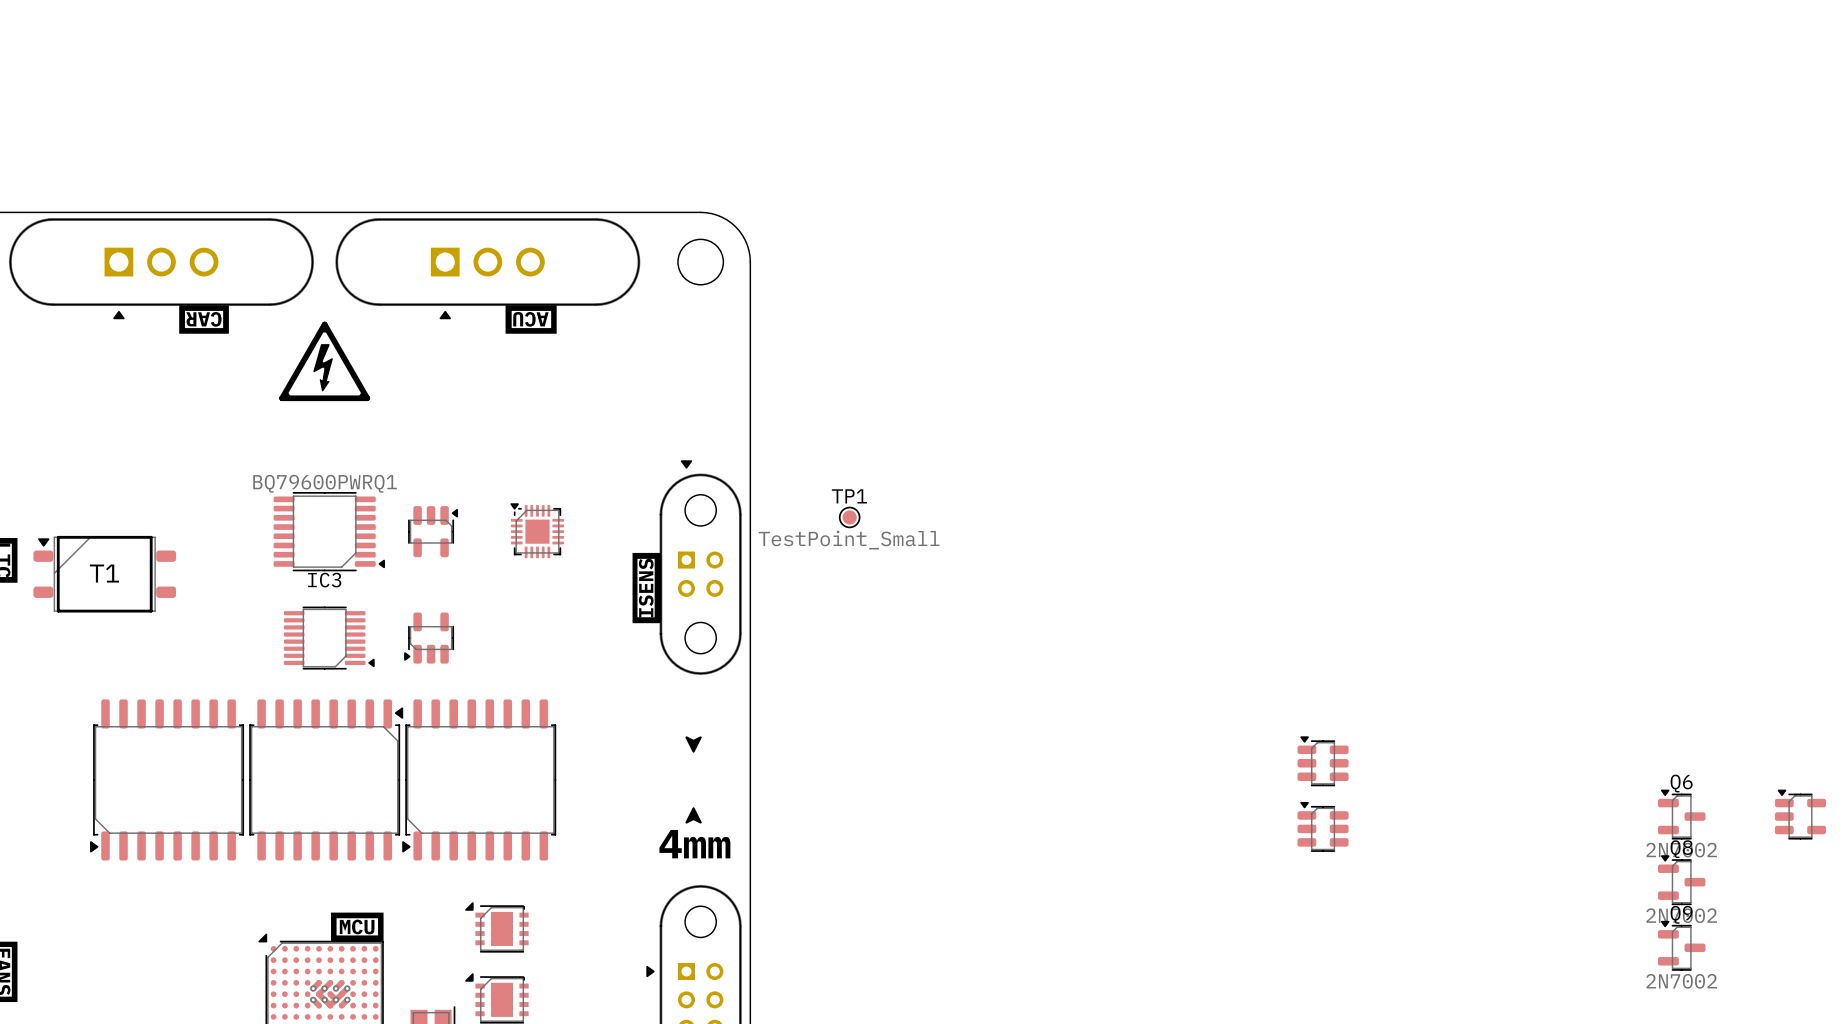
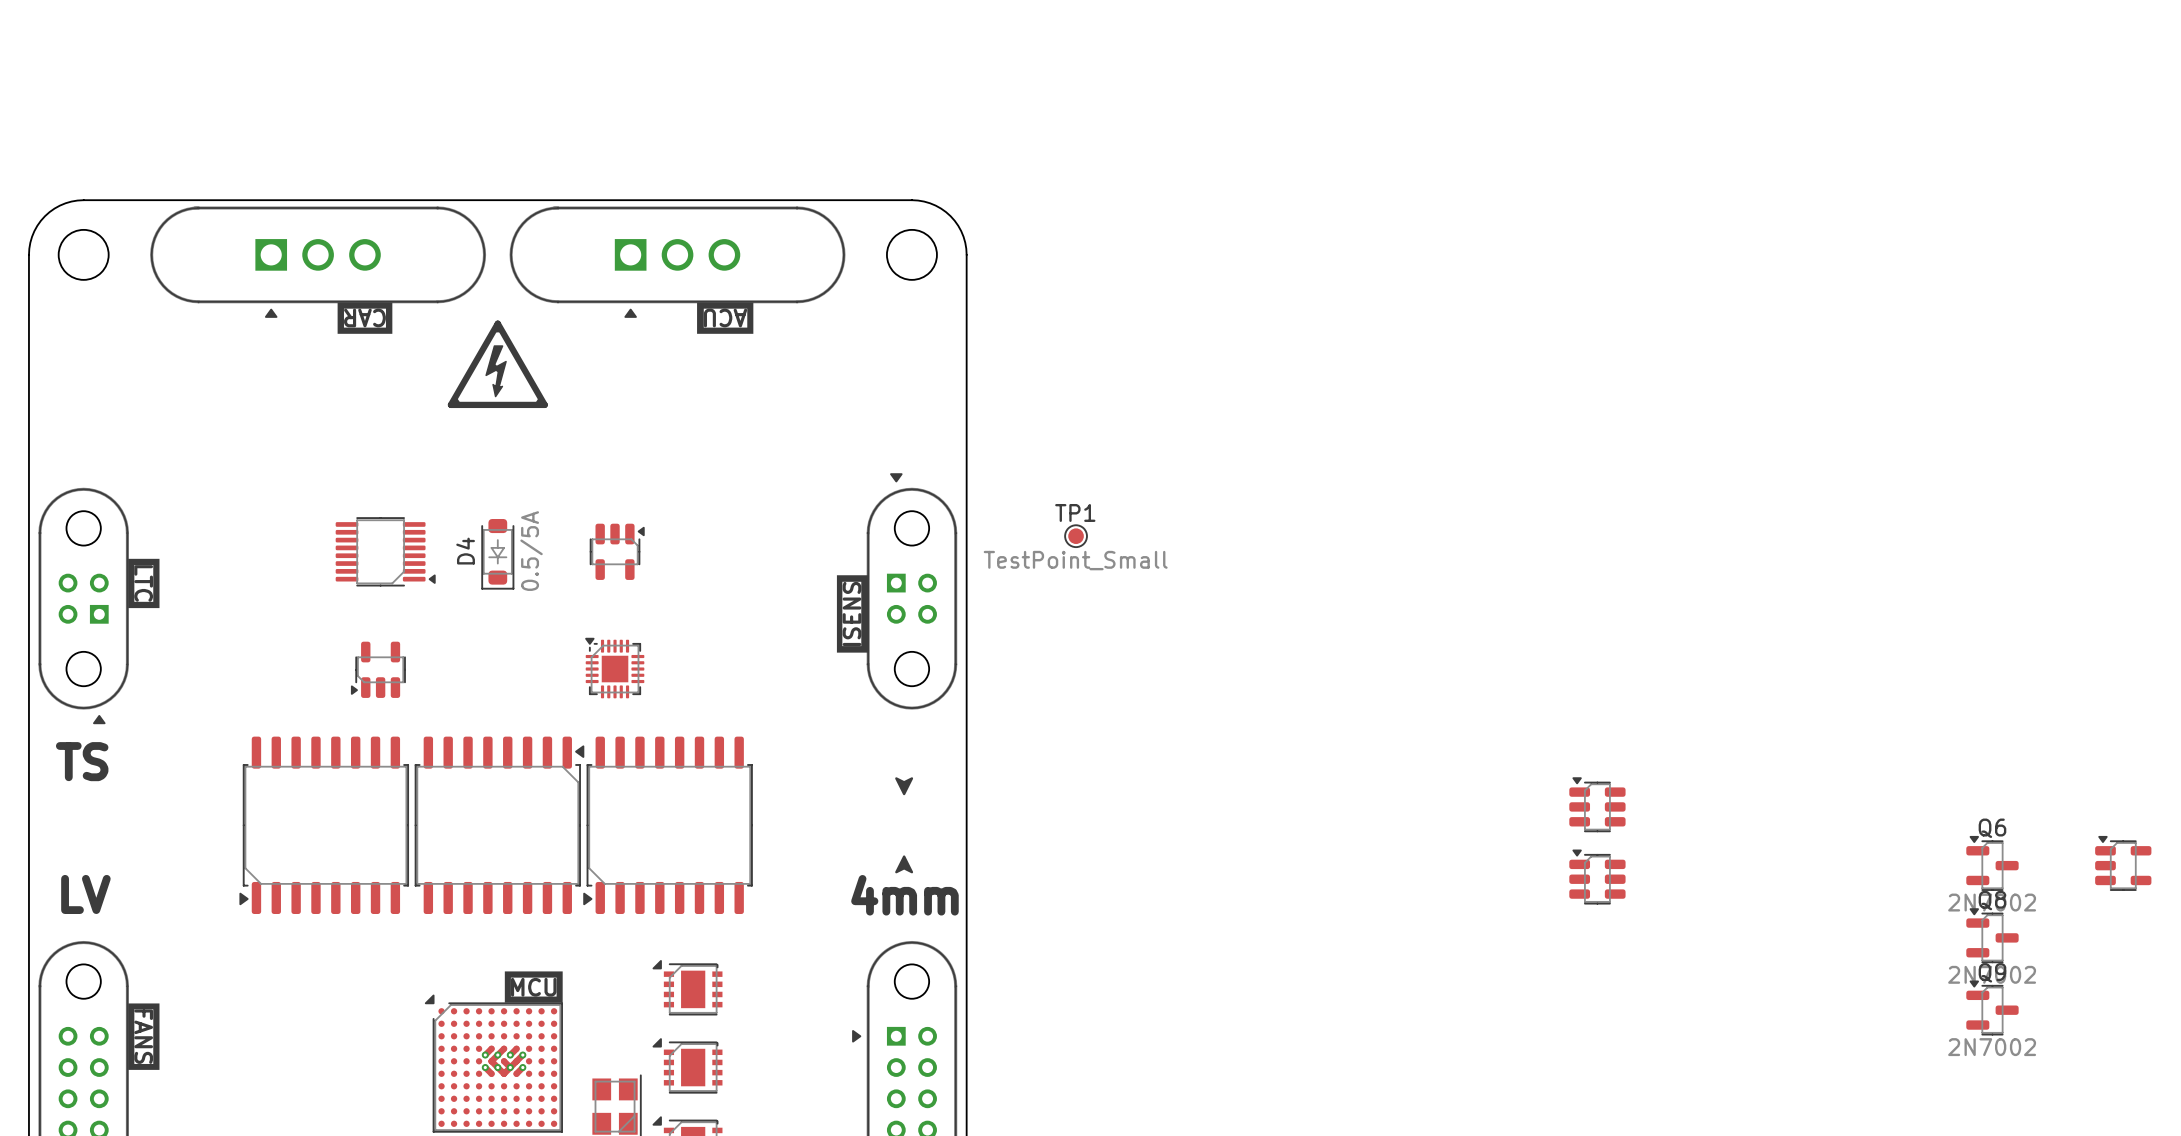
part: (537, 530) -> none
IC3: BQ79600PWRQ1 (329, 531) -> none
D4: none -> 0.5/5A (497, 554)
T1: (104, 574) -> none
part footprint: [404, 612, 455, 664] -> [585, 637, 645, 699]
part: none -> (378, 669)
part position: (329, 638) -> (385, 551)

